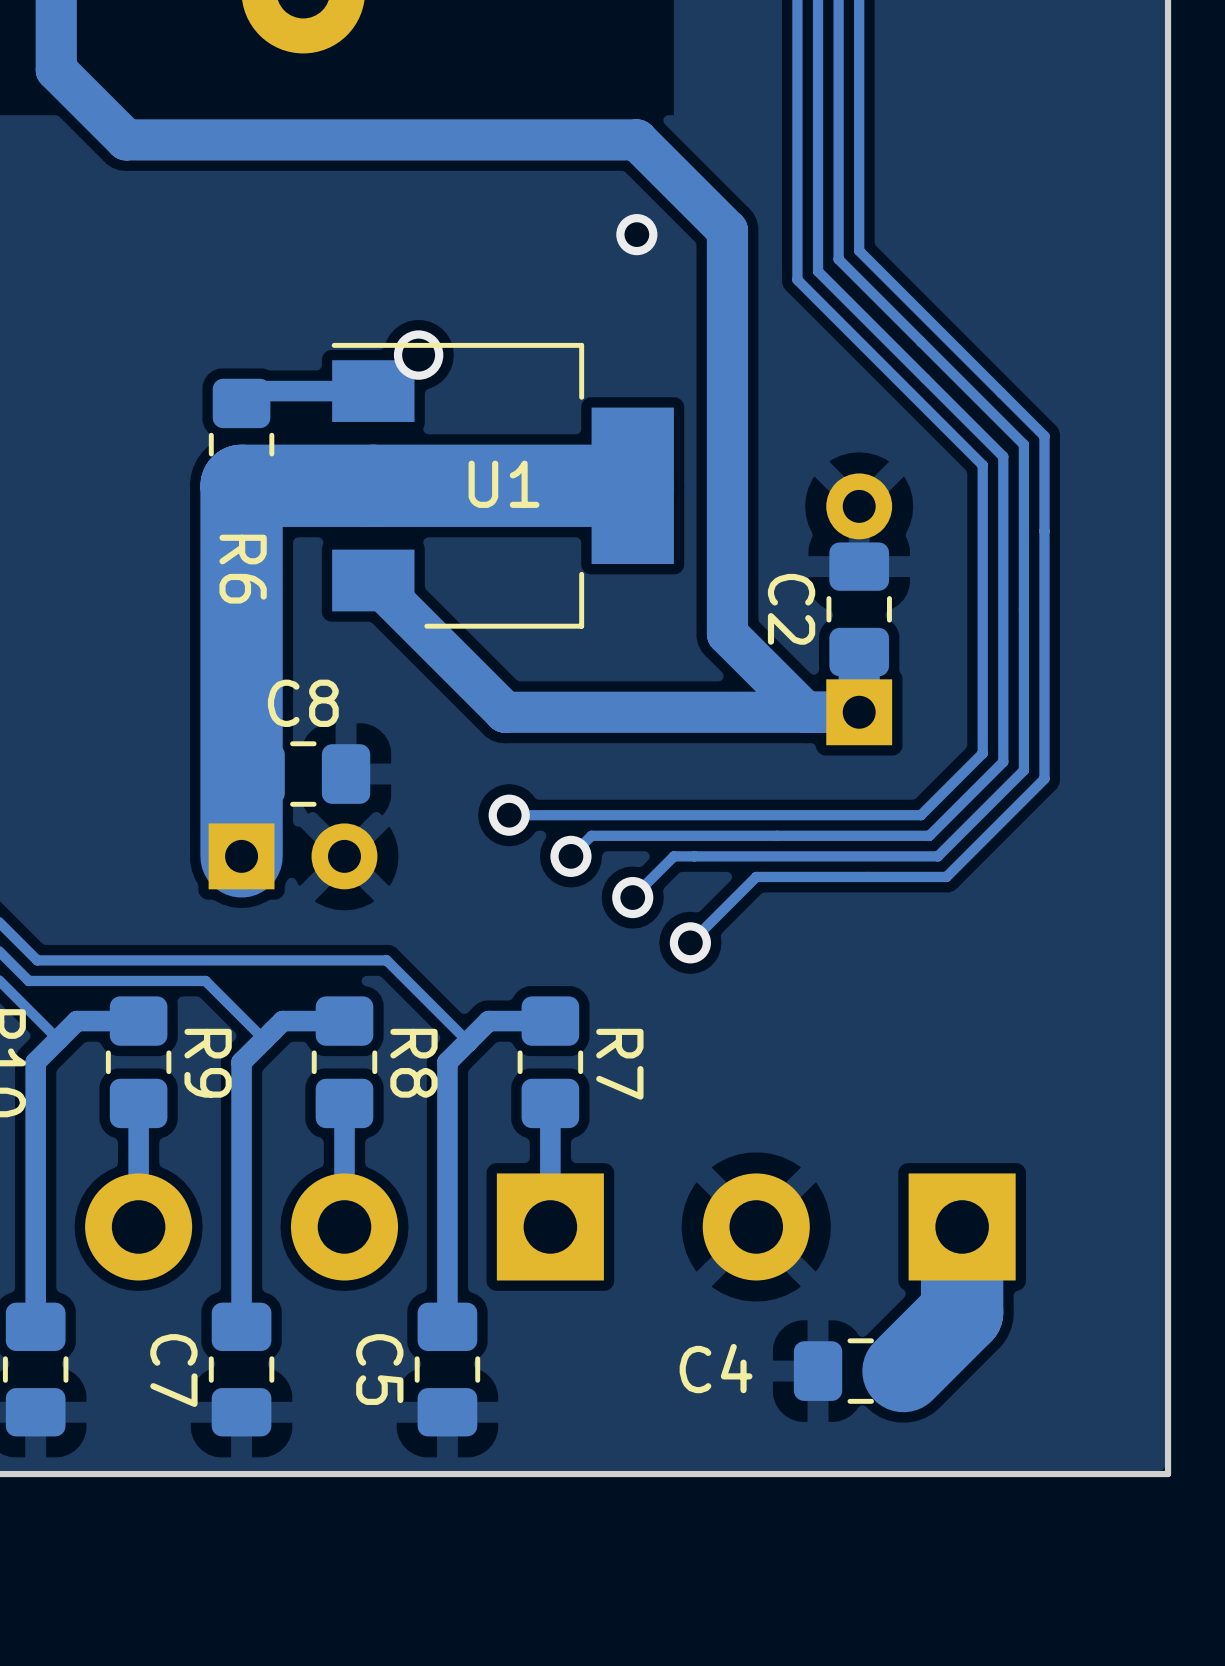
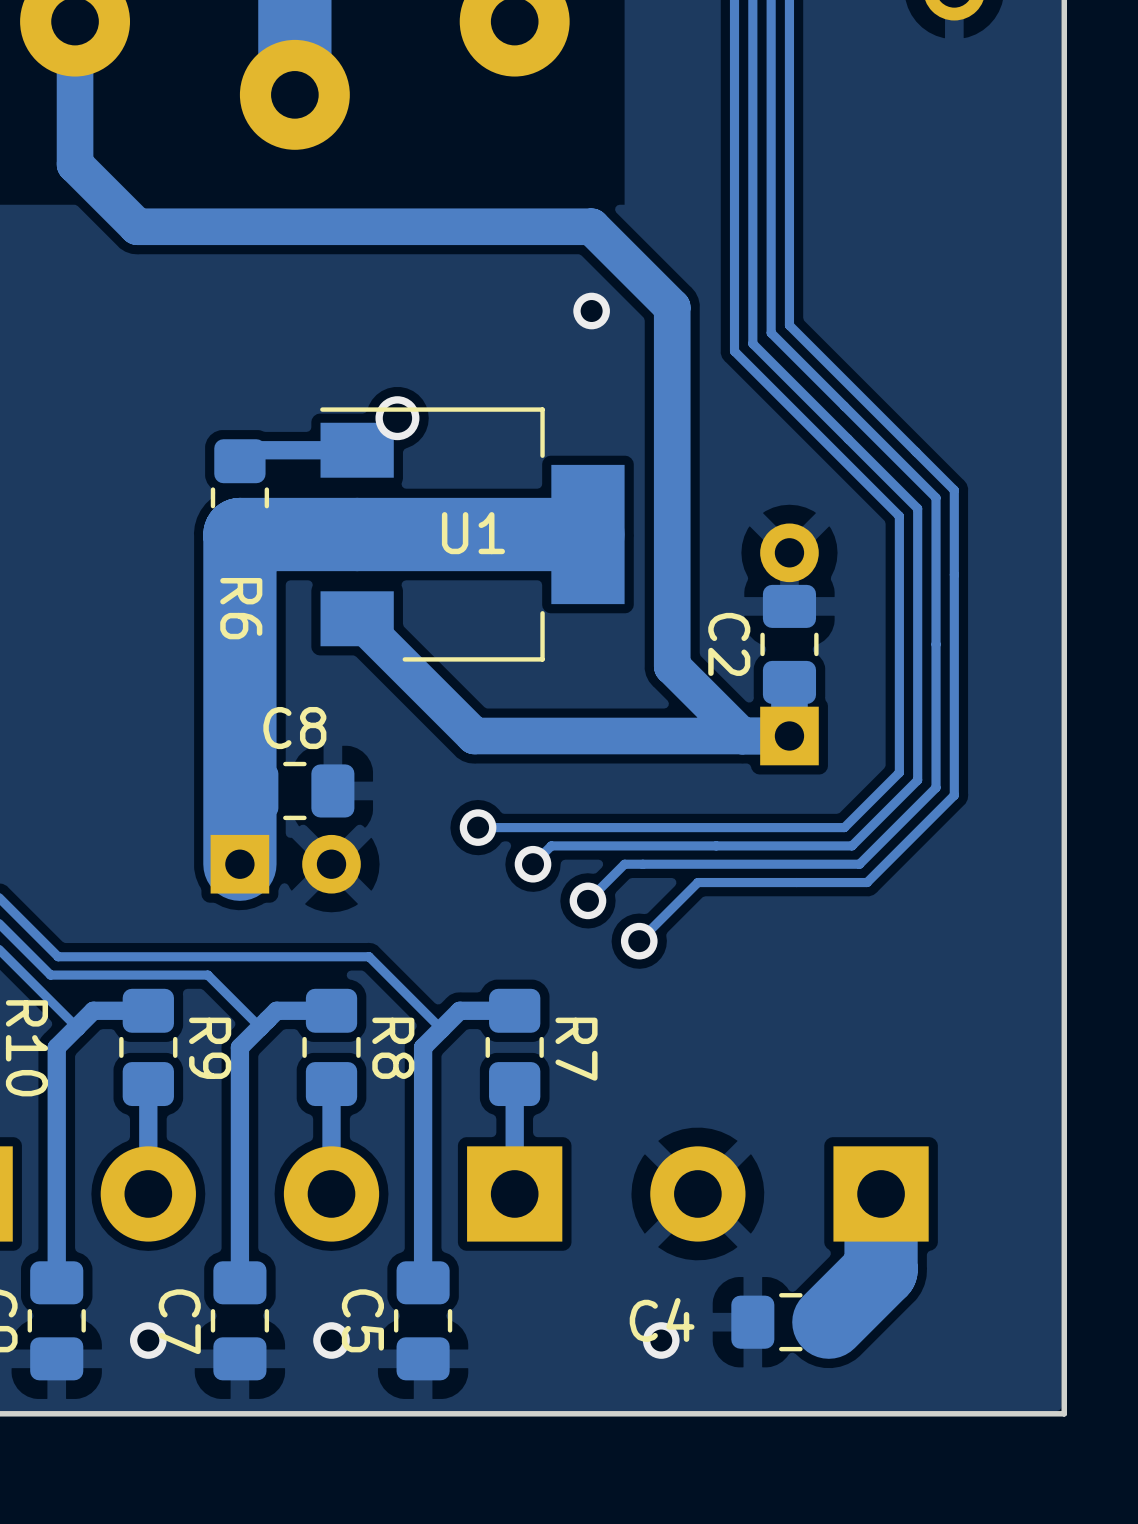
via: none -> (148, 1340)
via: none -> (331, 1340)
via: none -> (661, 1340)

